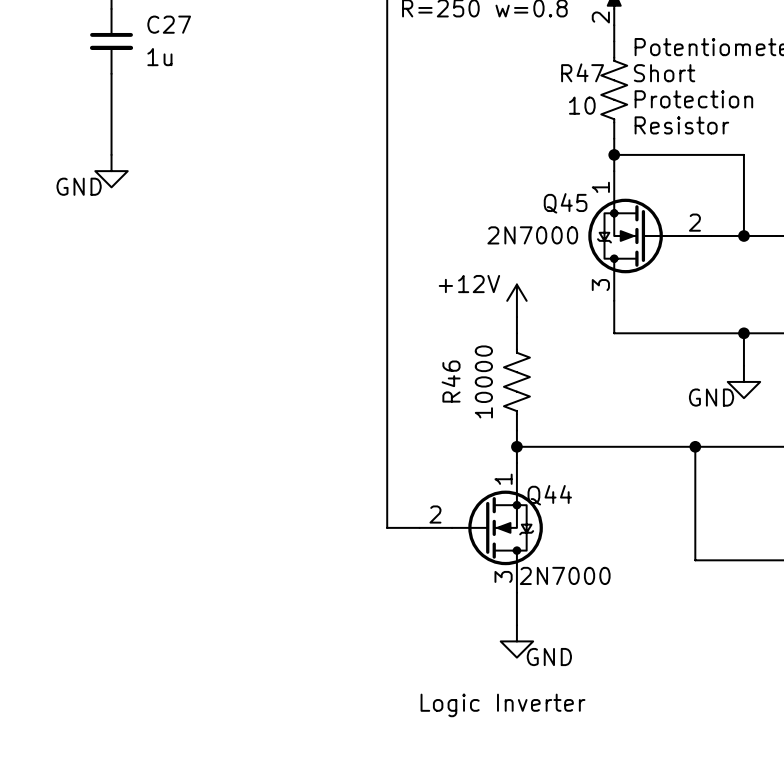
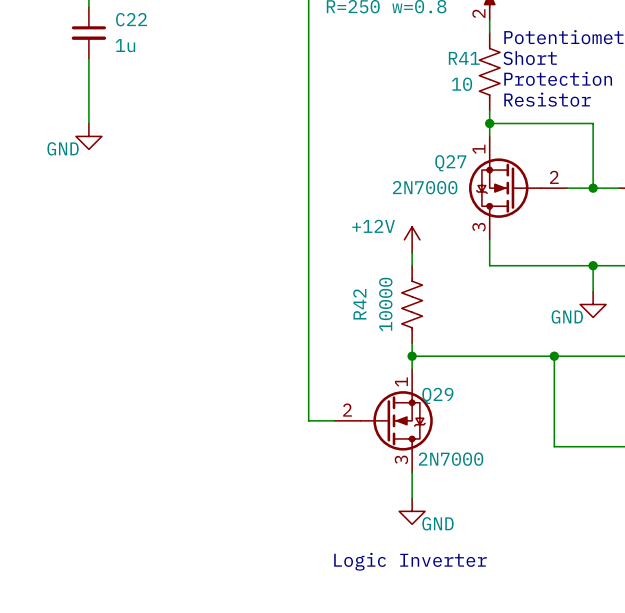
C27 name: C27 (169, 24) -> C22 (131, 19)
R47 name: R47 (582, 72) -> R41 (464, 58)
Q45 name: Q45 (565, 203) -> Q27 (450, 163)
R46 name: R46 (451, 381) -> R42 (359, 304)
Q44 name: Q44 (549, 495) -> Q29 (437, 395)

